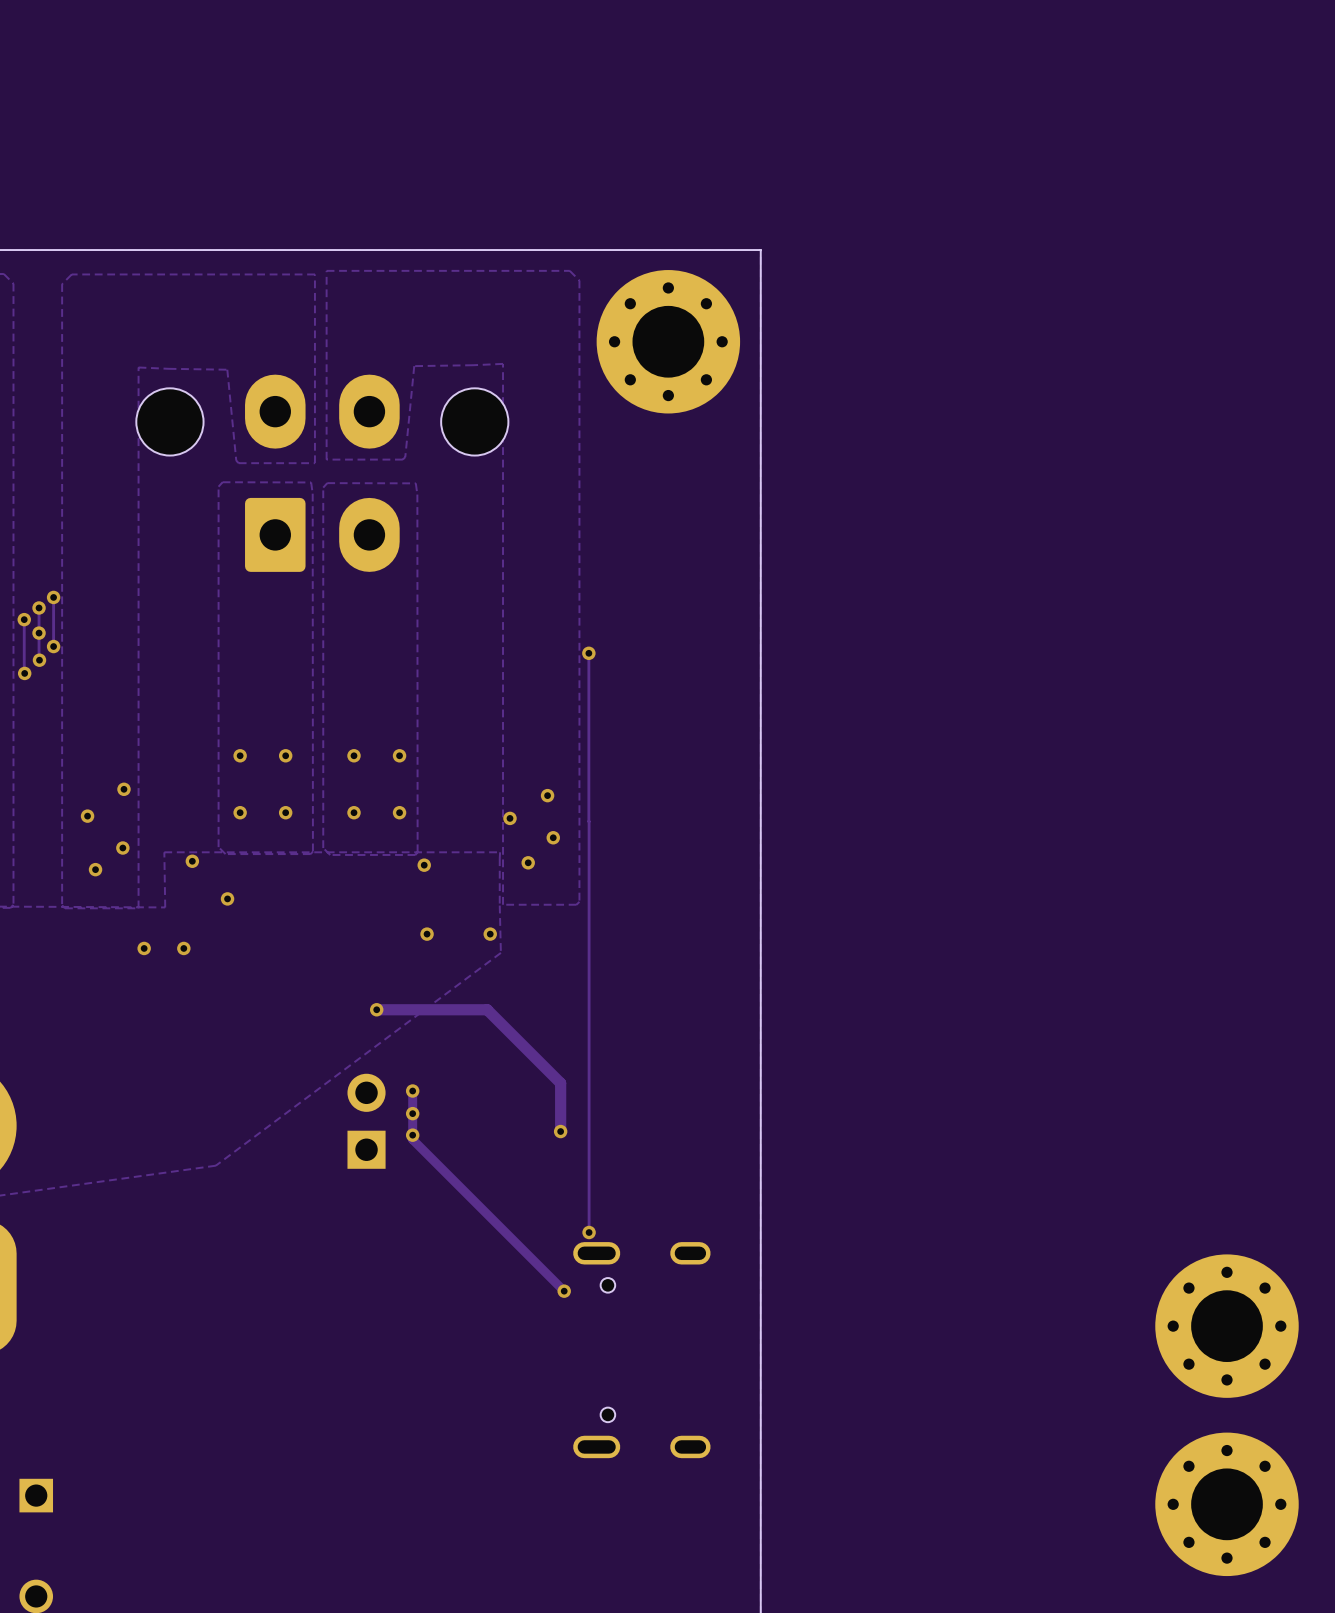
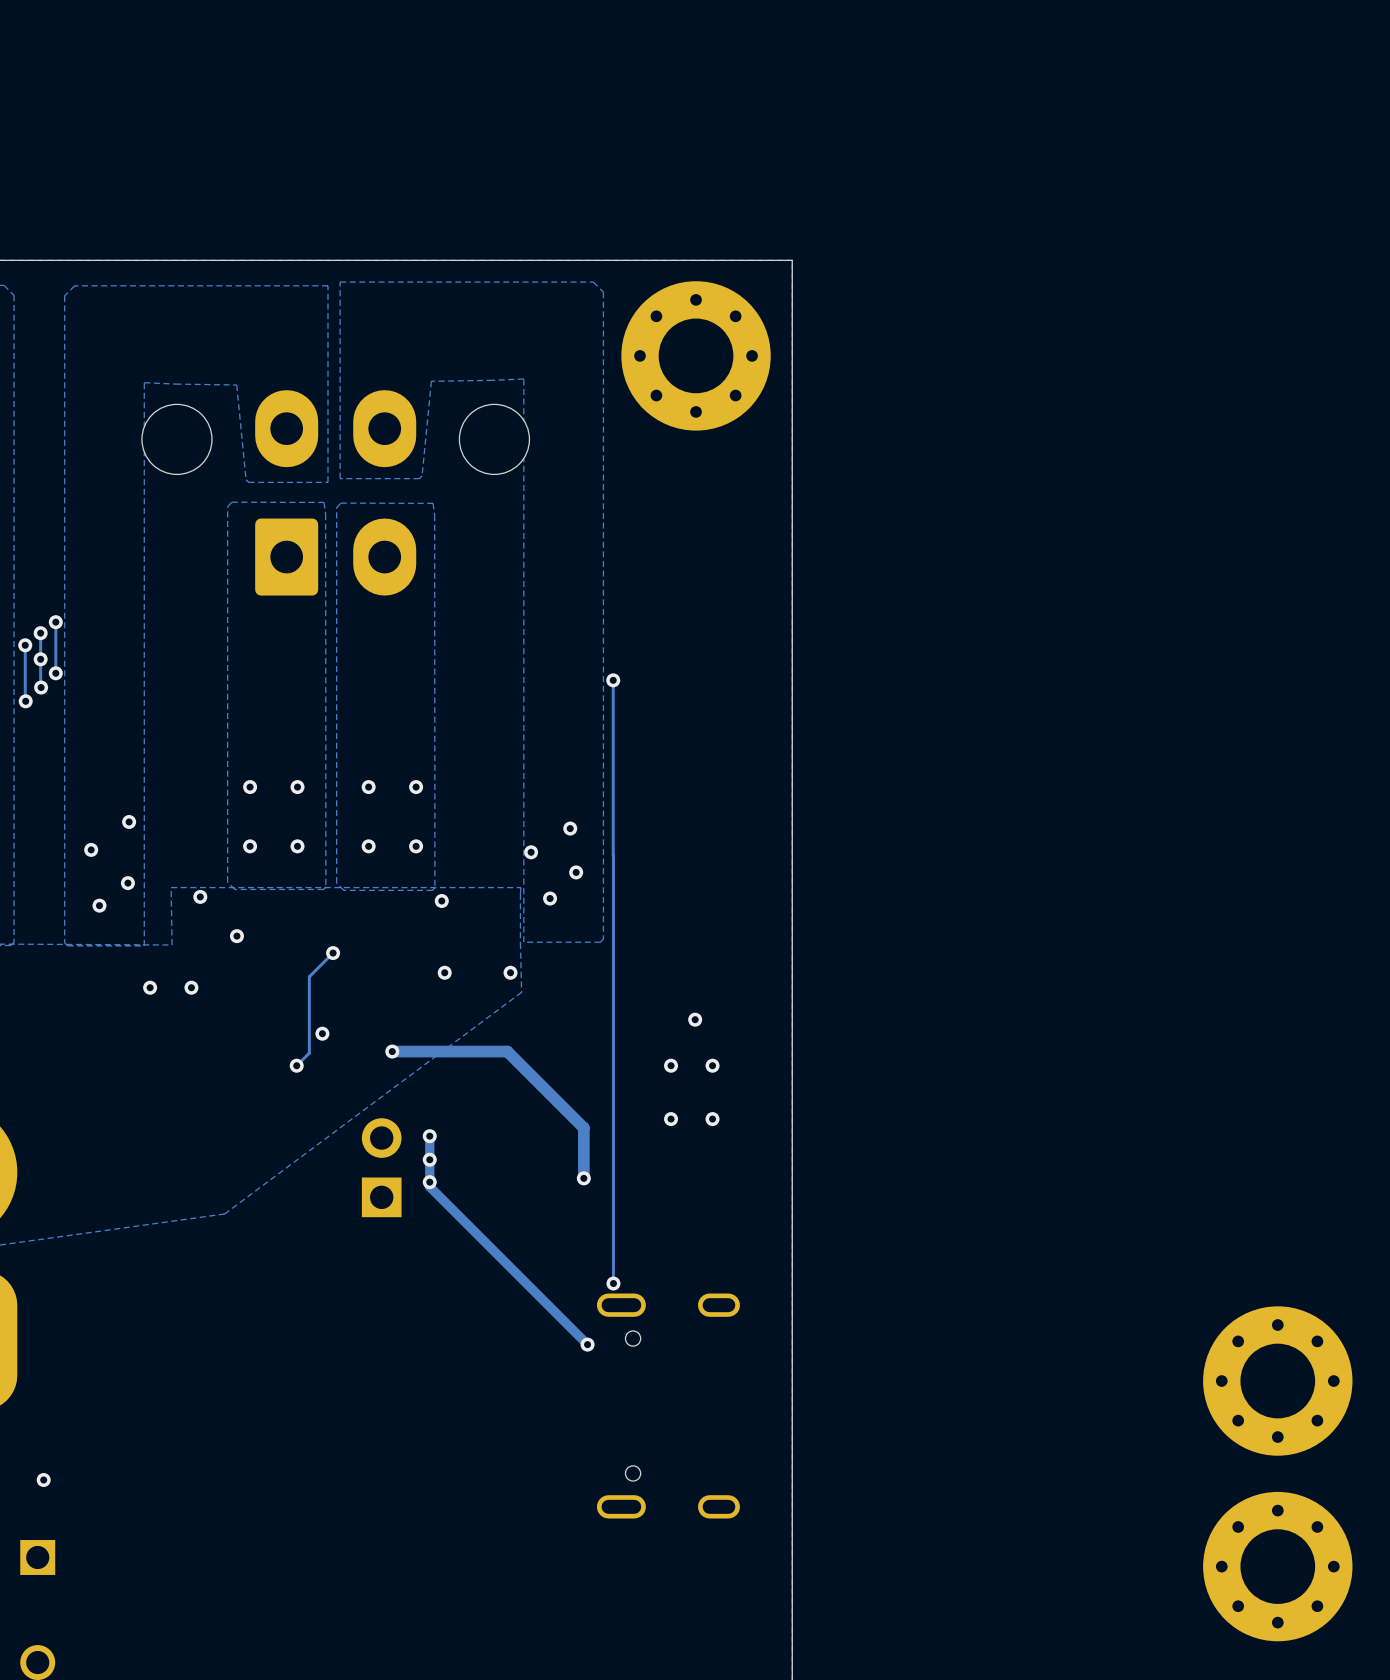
track: none -> (333, 953) (309, 976) (309, 1053) (296, 1065)
via: none -> (333, 953)
via: none -> (695, 1019)
via: none -> (322, 1033)
via: none -> (296, 1065)
via: none -> (671, 1065)
via: none -> (712, 1065)
via: none -> (671, 1119)
via: none -> (712, 1119)
via: none -> (43, 1480)

